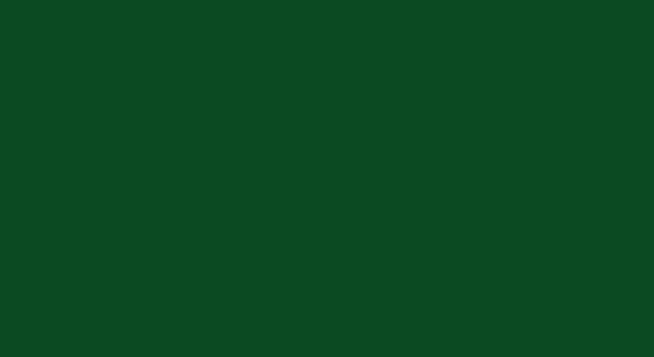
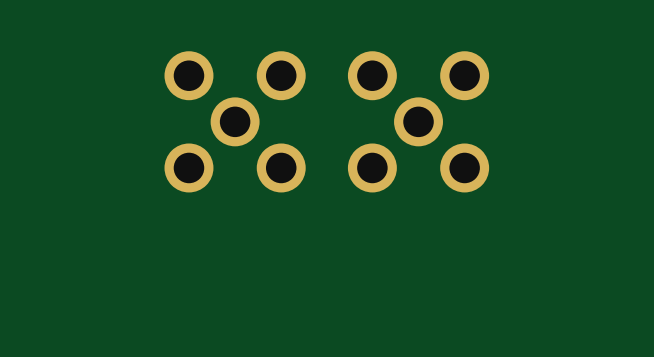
part: none -> (235, 121)
part: none -> (418, 121)

